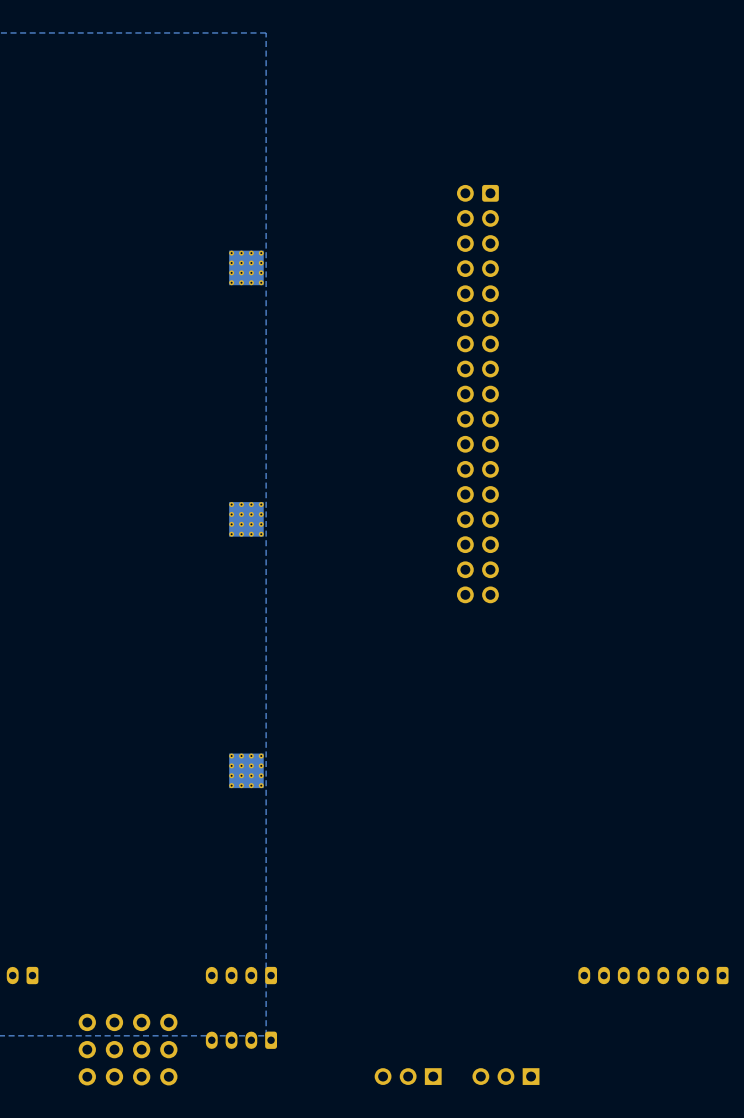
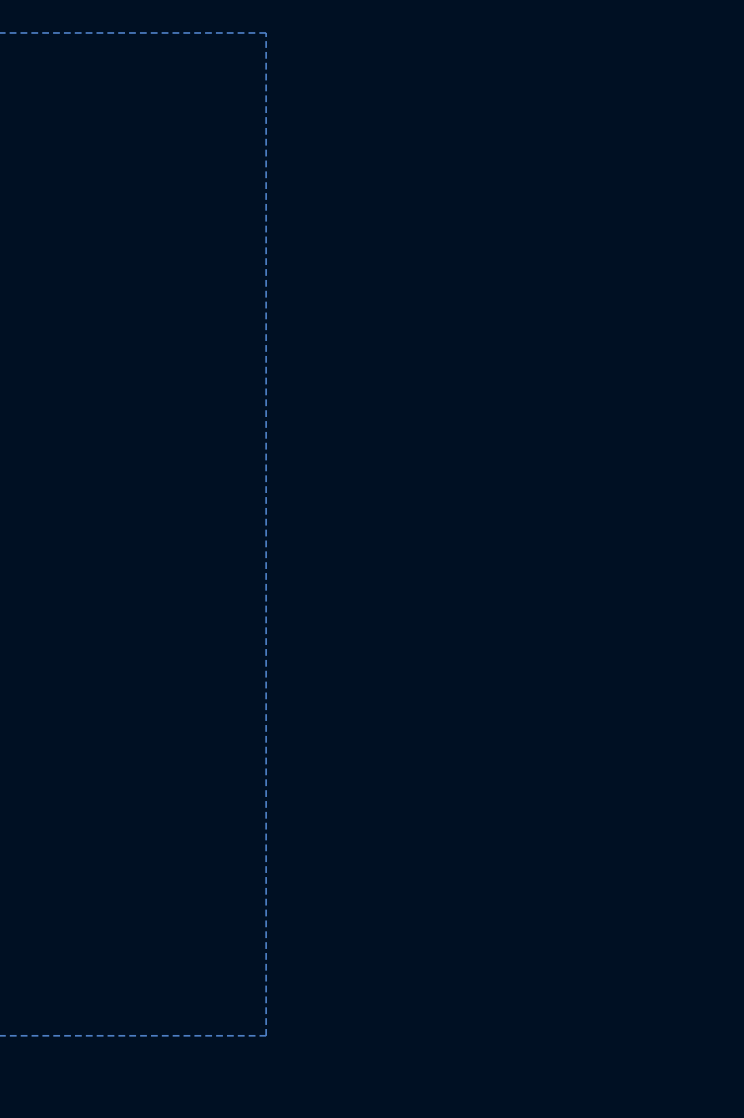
part: (246, 267) -> none
part: (477, 394) -> none
part: (246, 519) -> none
part: (246, 770) -> none
part: (22, 975) -> none
part: (241, 975) -> none
part: (653, 975) -> none
part: (87, 1022) -> none
part: (114, 1022) -> none
part: (141, 1022) -> none
part: (168, 1022) -> none
part: (241, 1040) -> none
part: (87, 1049) -> none
part: (114, 1049) -> none
part: (141, 1049) -> none
part: (168, 1049) -> none
part: (87, 1076) -> none
part: (114, 1076) -> none
part: (141, 1076) -> none
part: (168, 1076) -> none
part: (408, 1076) -> none
part: (505, 1076) -> none

